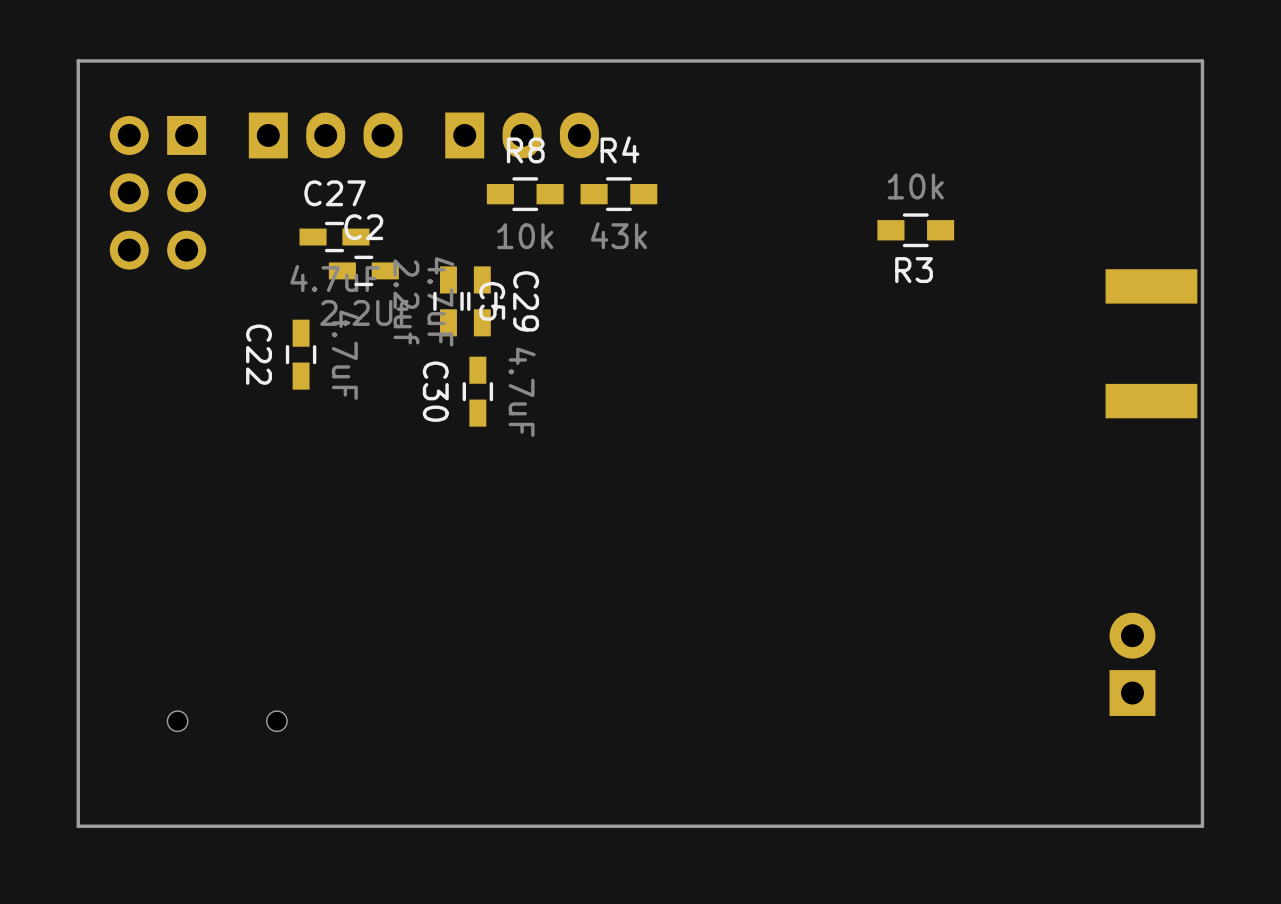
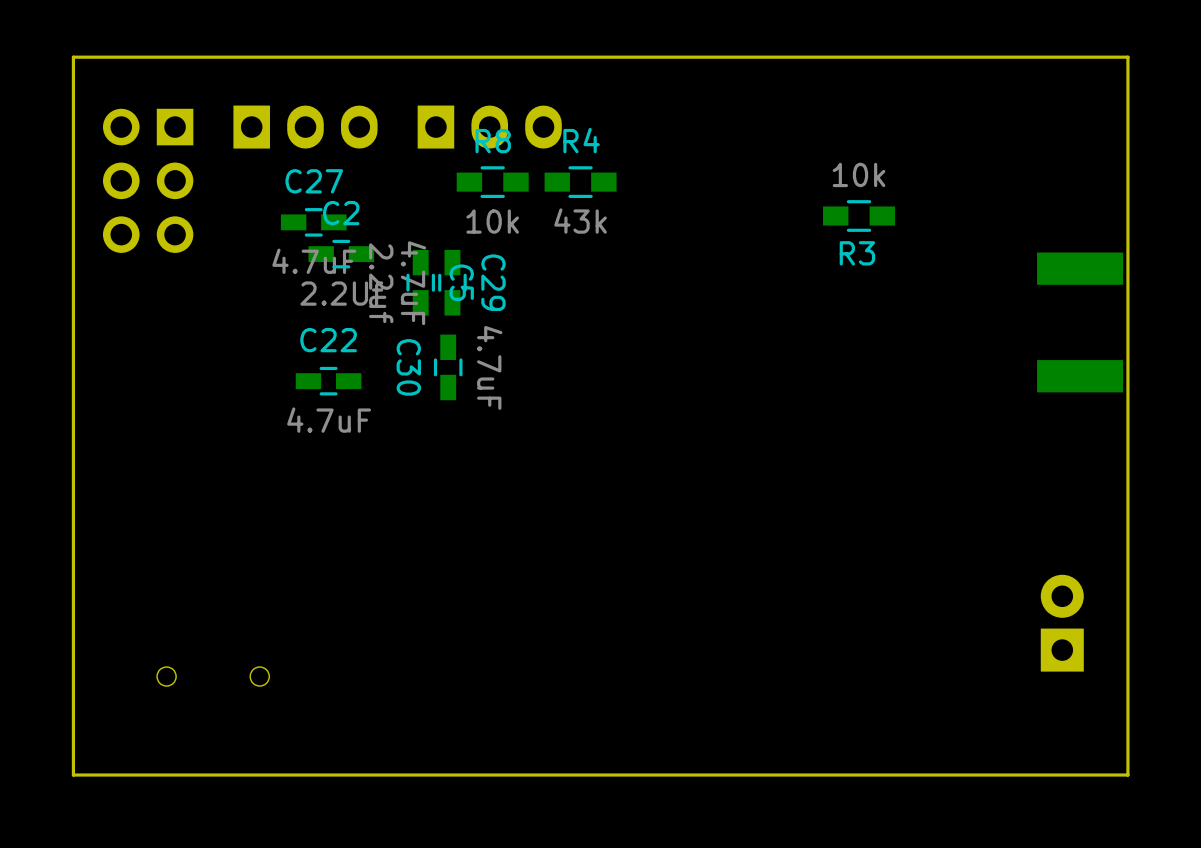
C22 rotation: 0° (301, 354) -> 90° clockwise (328, 381)
C22 position: (301, 354) -> (328, 381)

